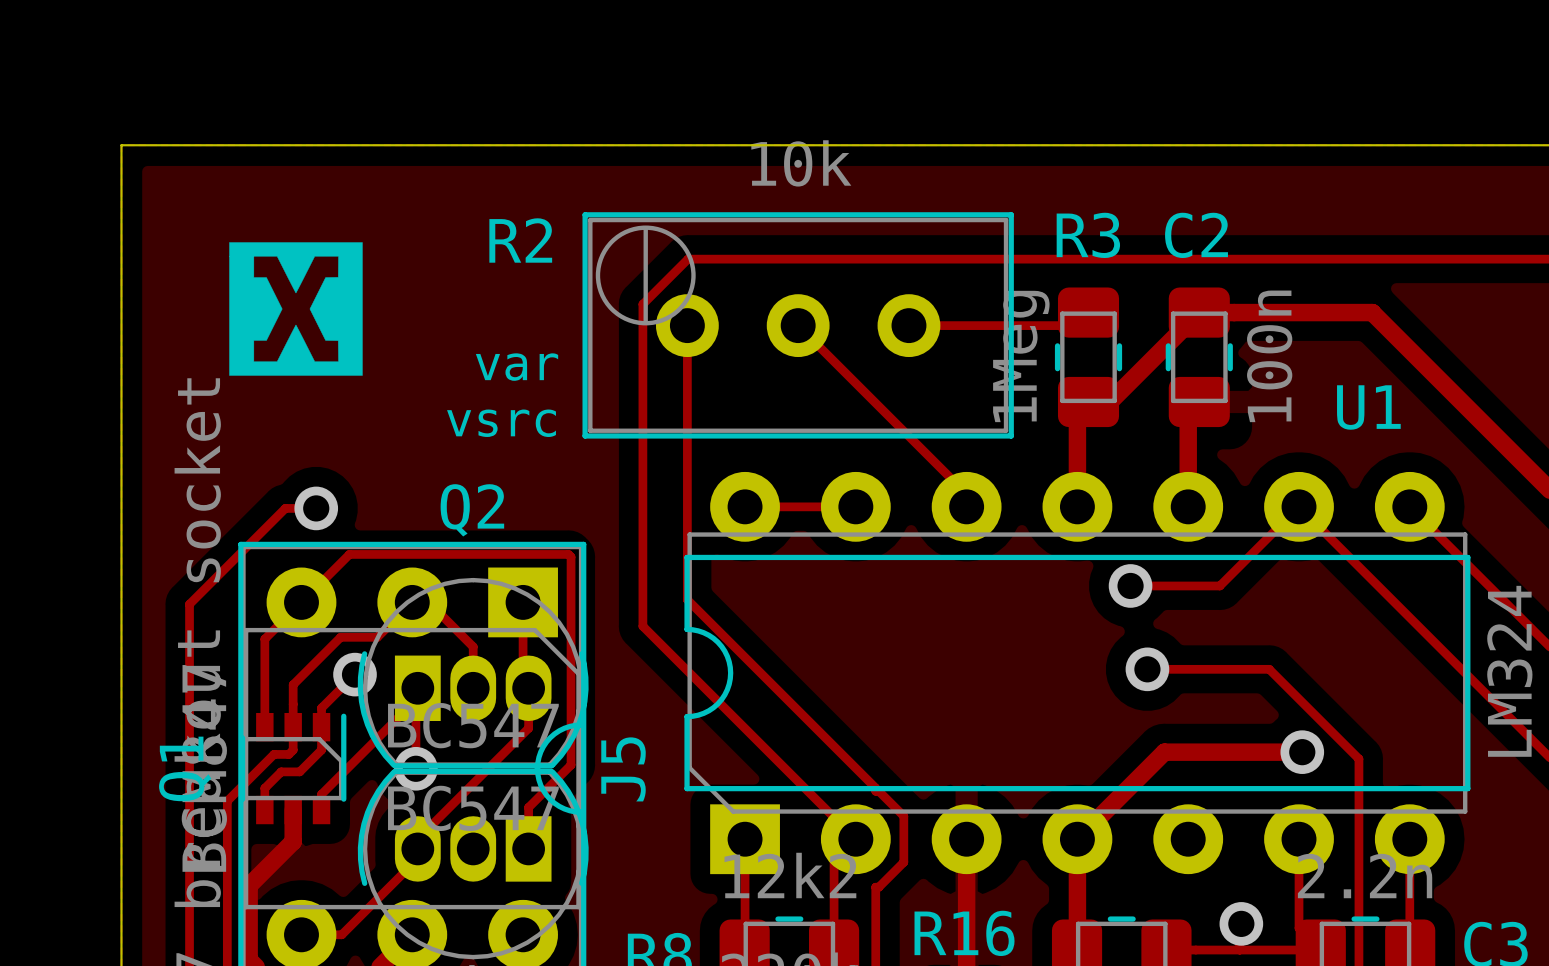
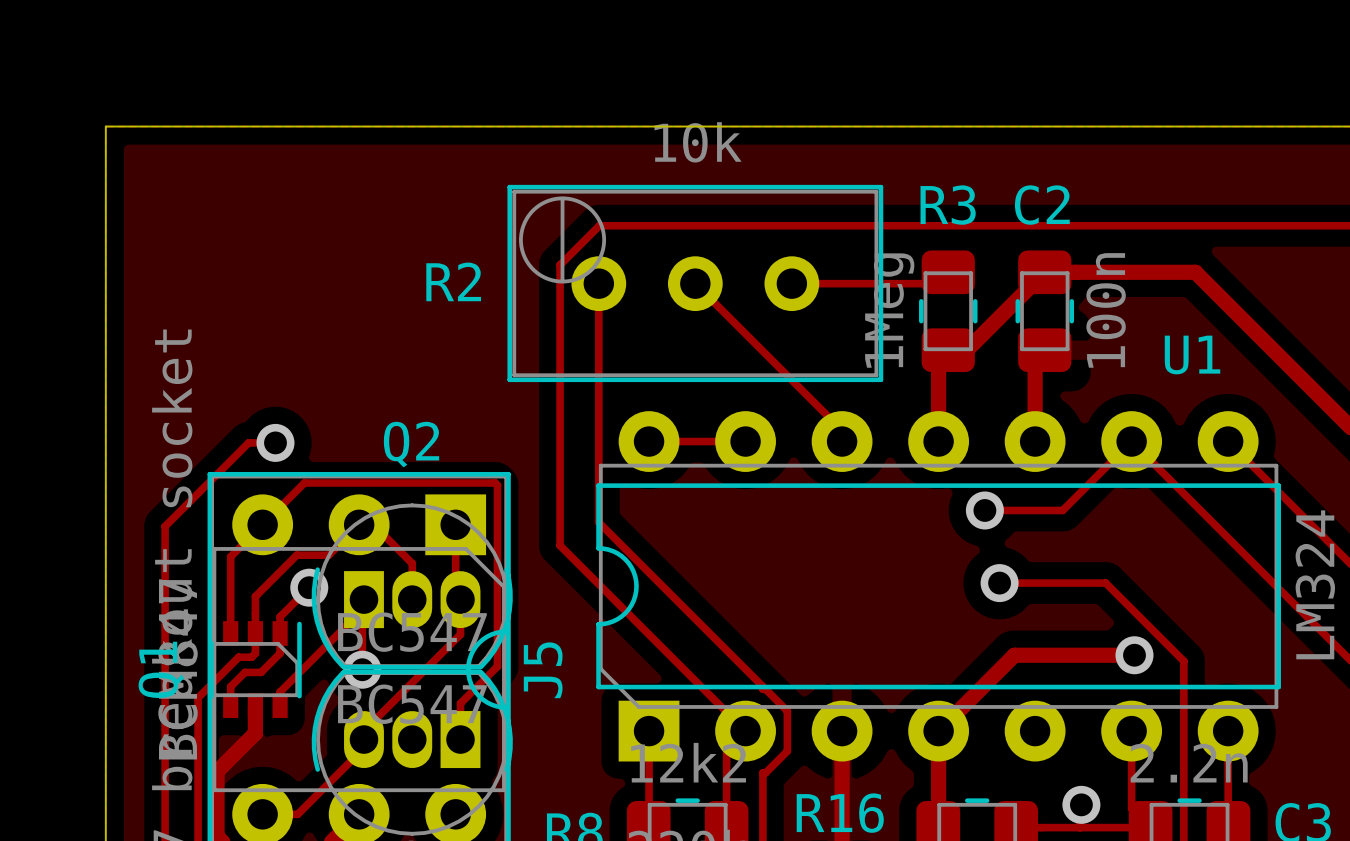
R2 name position: R2 (520, 240) -> R2 (453, 281)
drawing: [229, 242, 363, 376] -> none
text: var (517, 367) -> none
text: vsrc (501, 423) -> none

